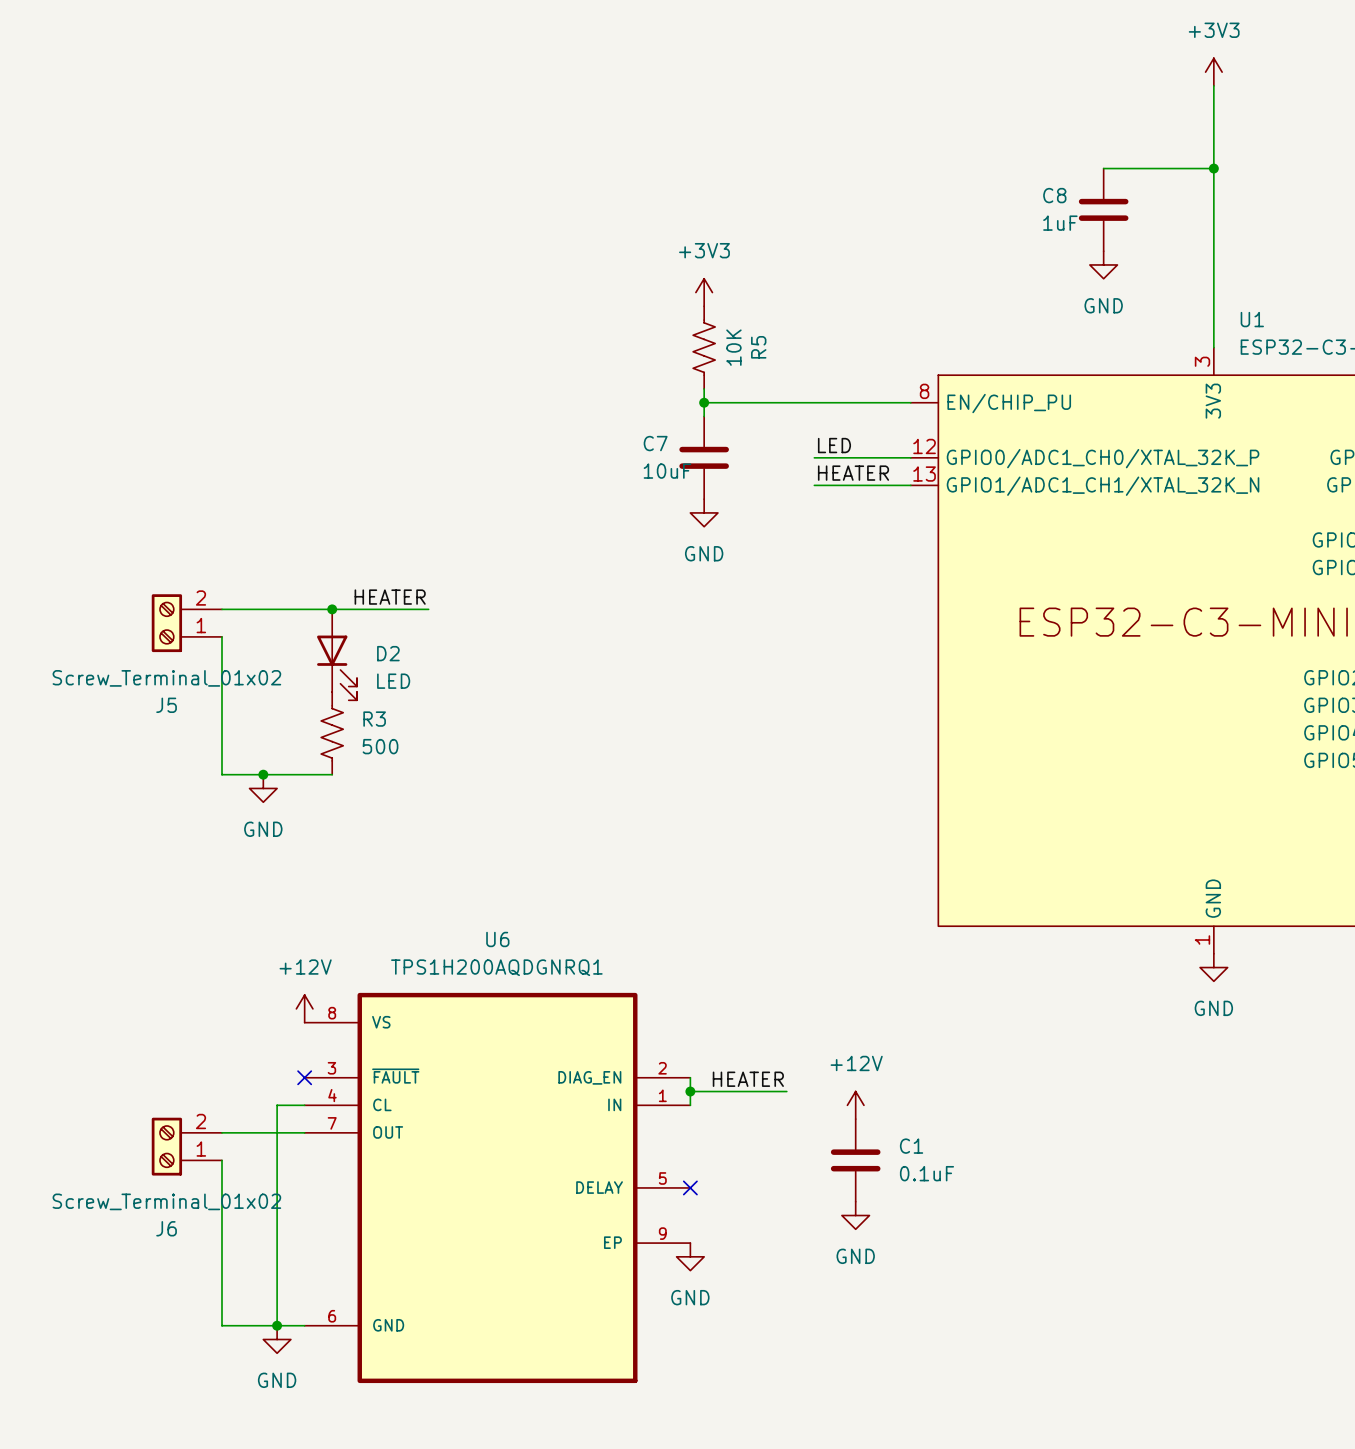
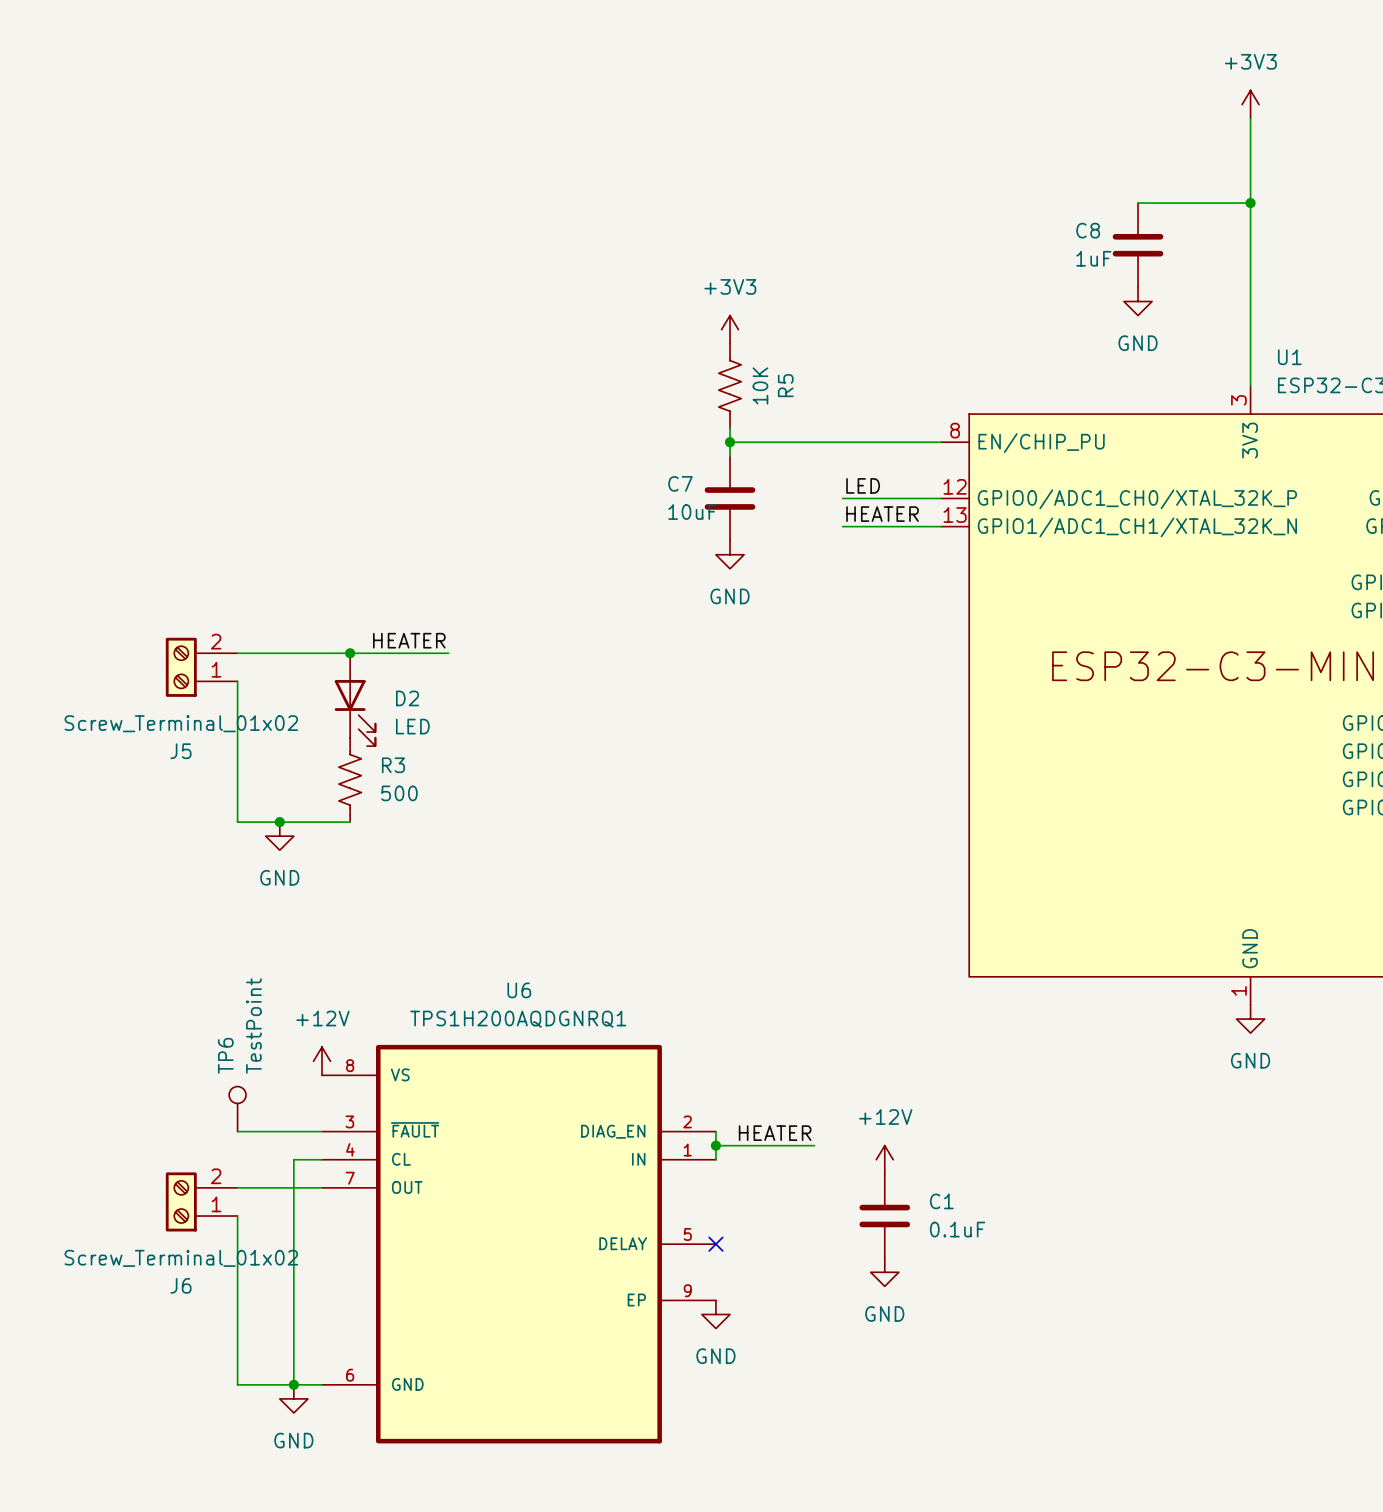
TP6: none -> TestPoint (237, 1109)
wire: none -> (237, 1131) (322, 1131)
no-connect mark: (304, 1077) -> none

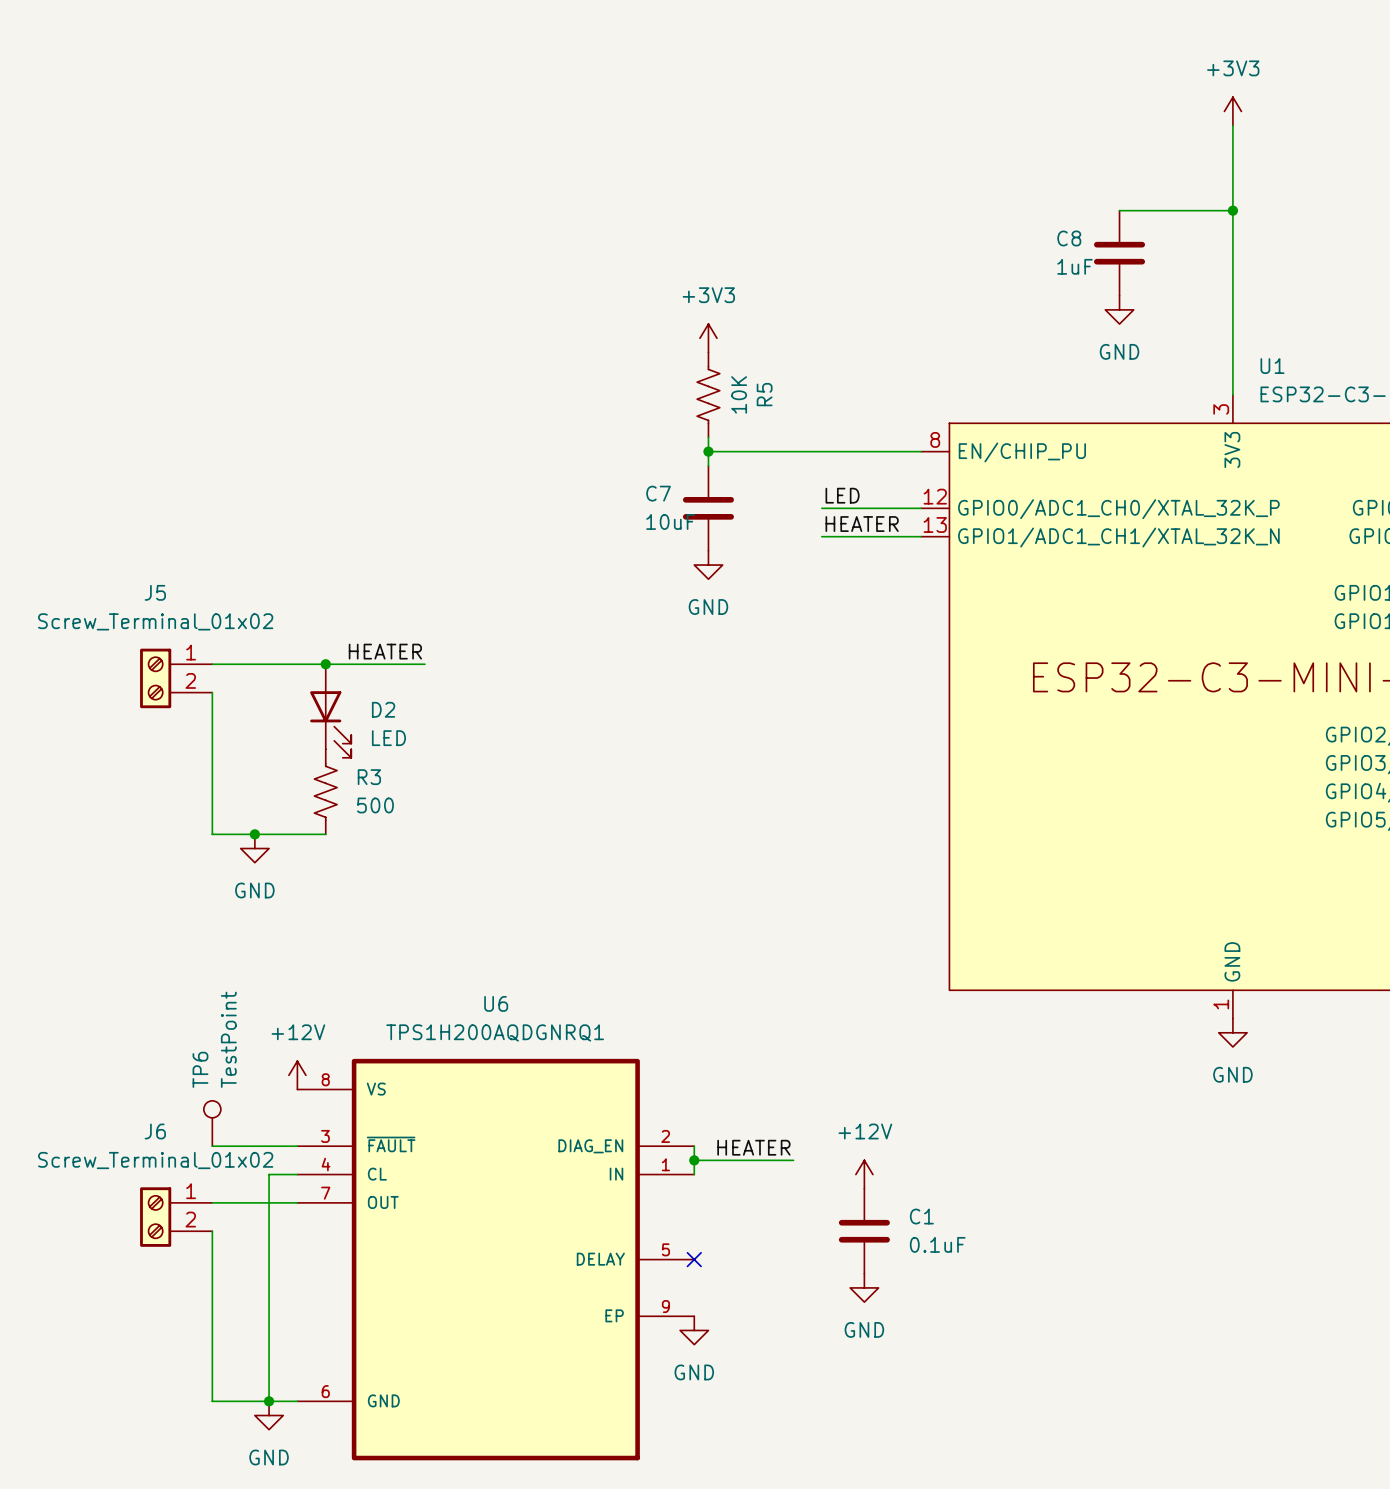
J5 flip: as is (181, 667) -> up-down (155, 678)
J6 flip: as is (181, 1201) -> up-down (155, 1217)

